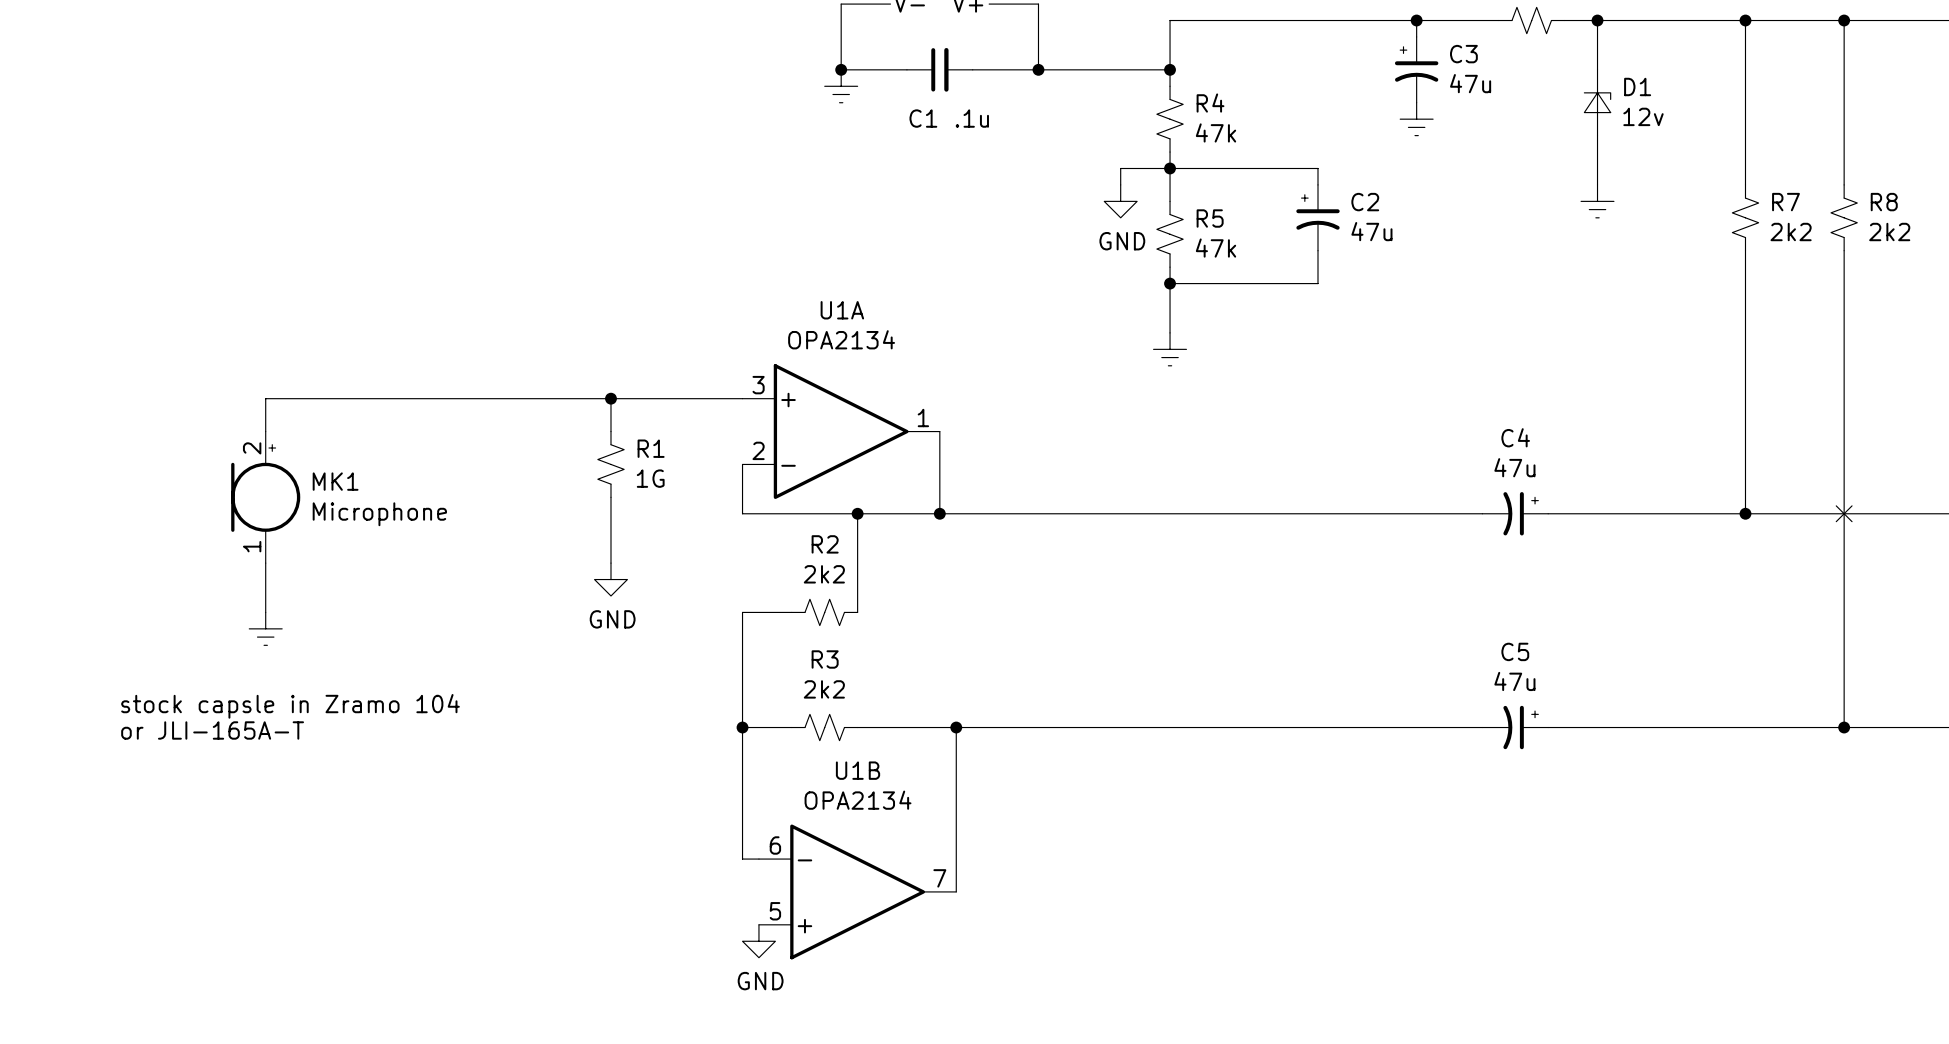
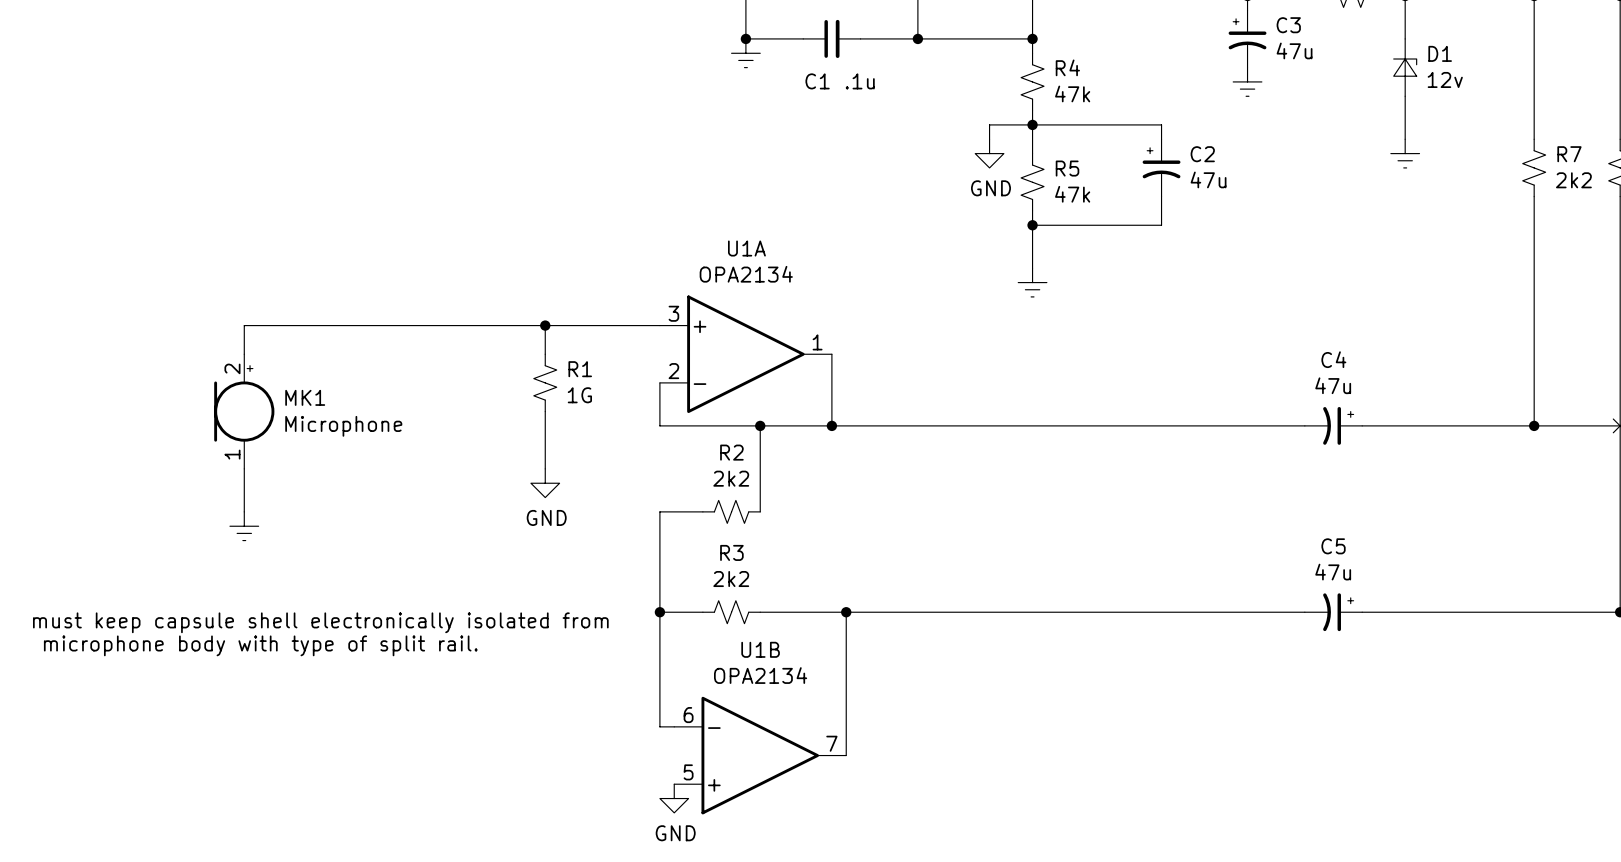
text: stock capsle in Zramo 104 (290, 706) -> none
text: or JLI-165A-T (212, 730) -> none
text: none -> must keep capsule shell electronically isolated from (320, 622)
text: none -> microphone body with type of split rail. (260, 645)

